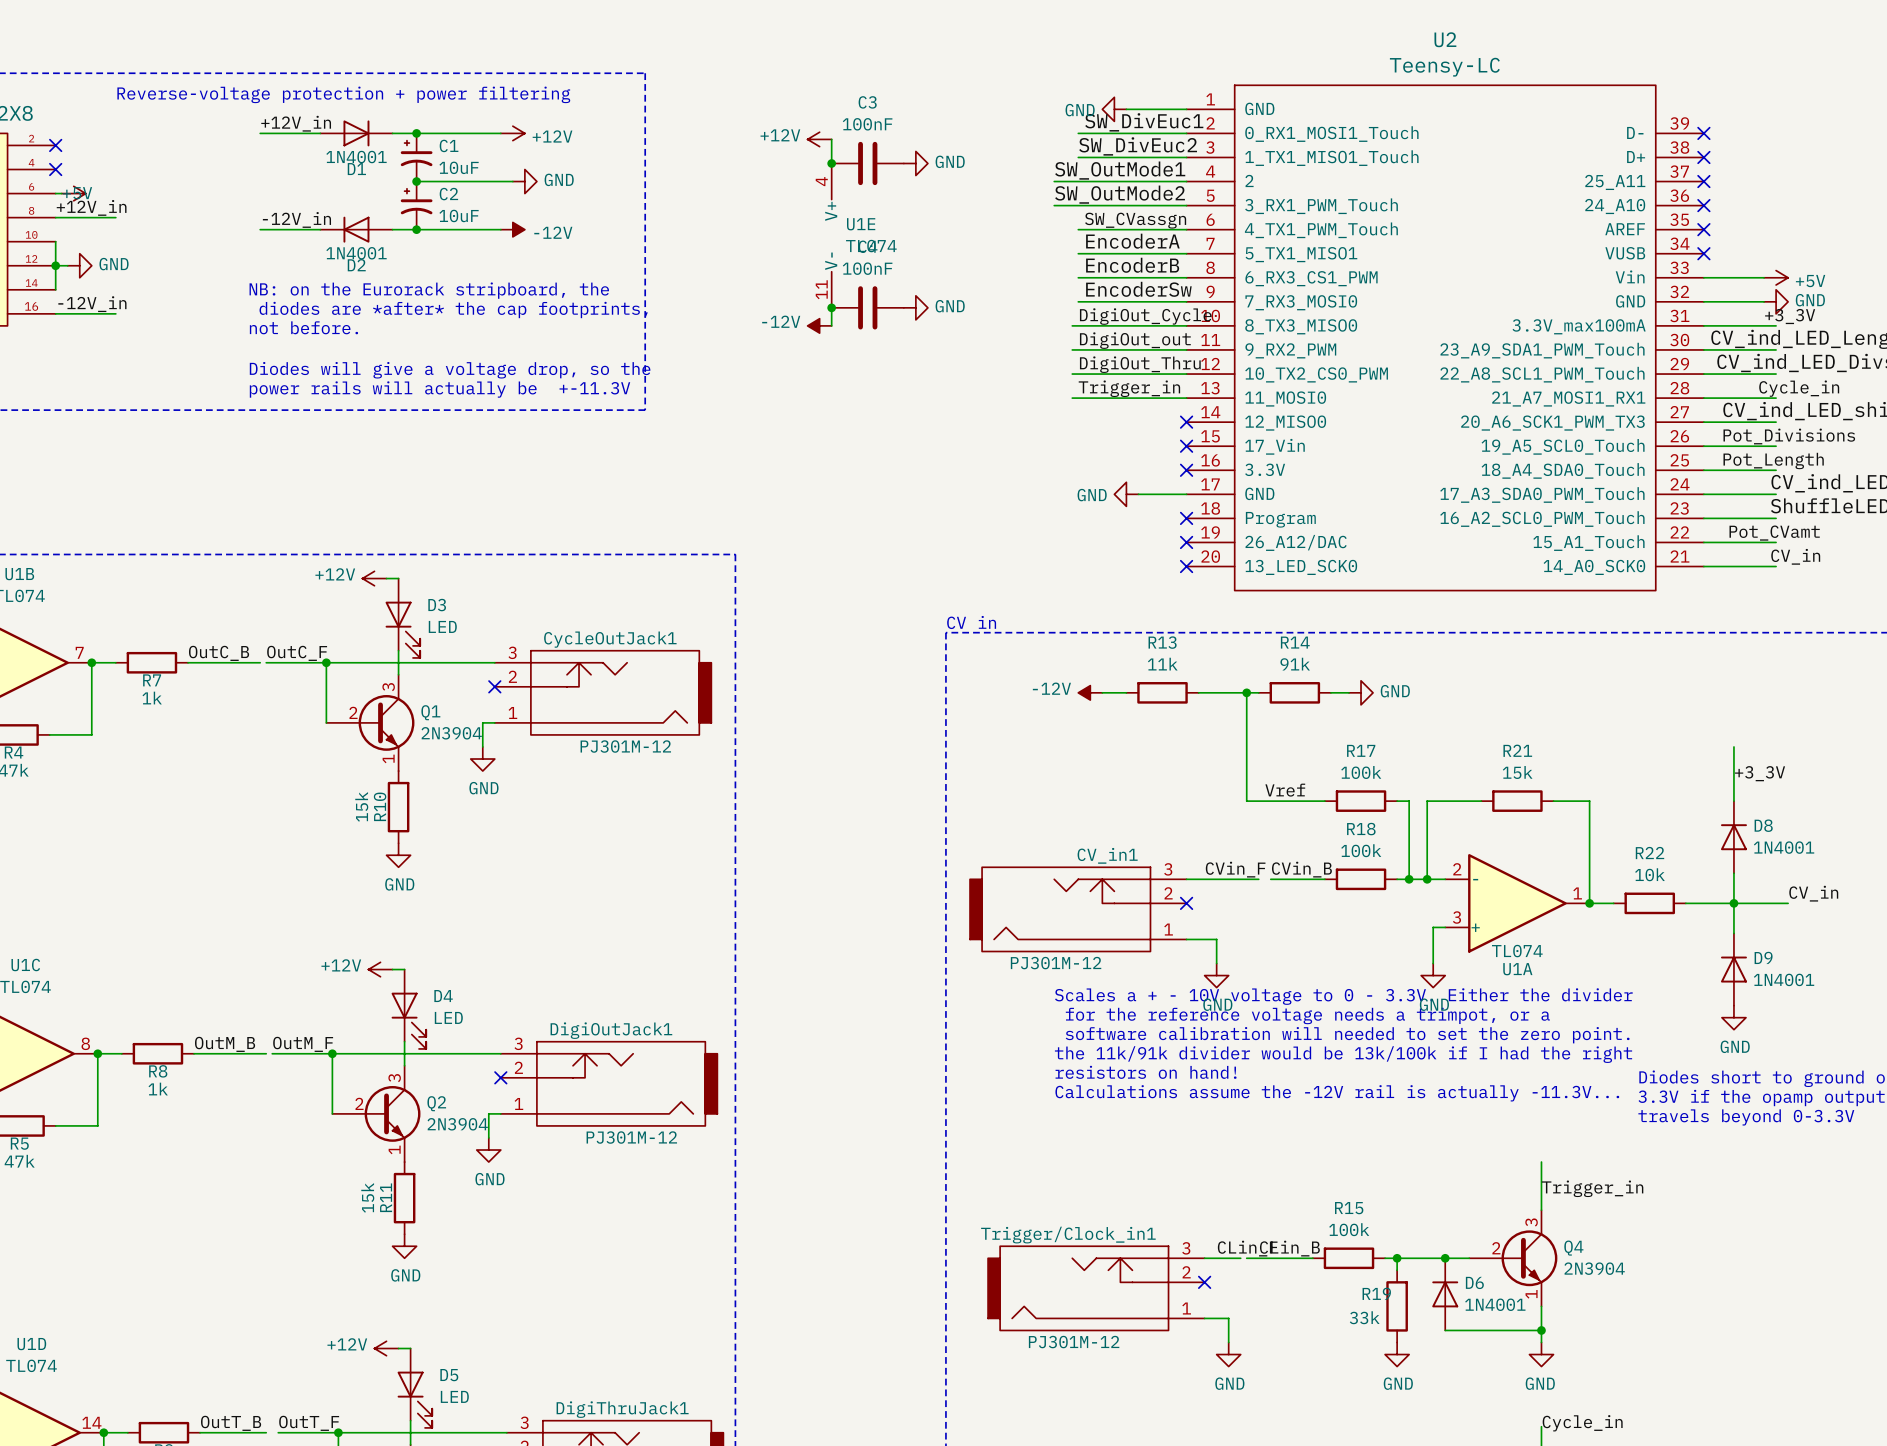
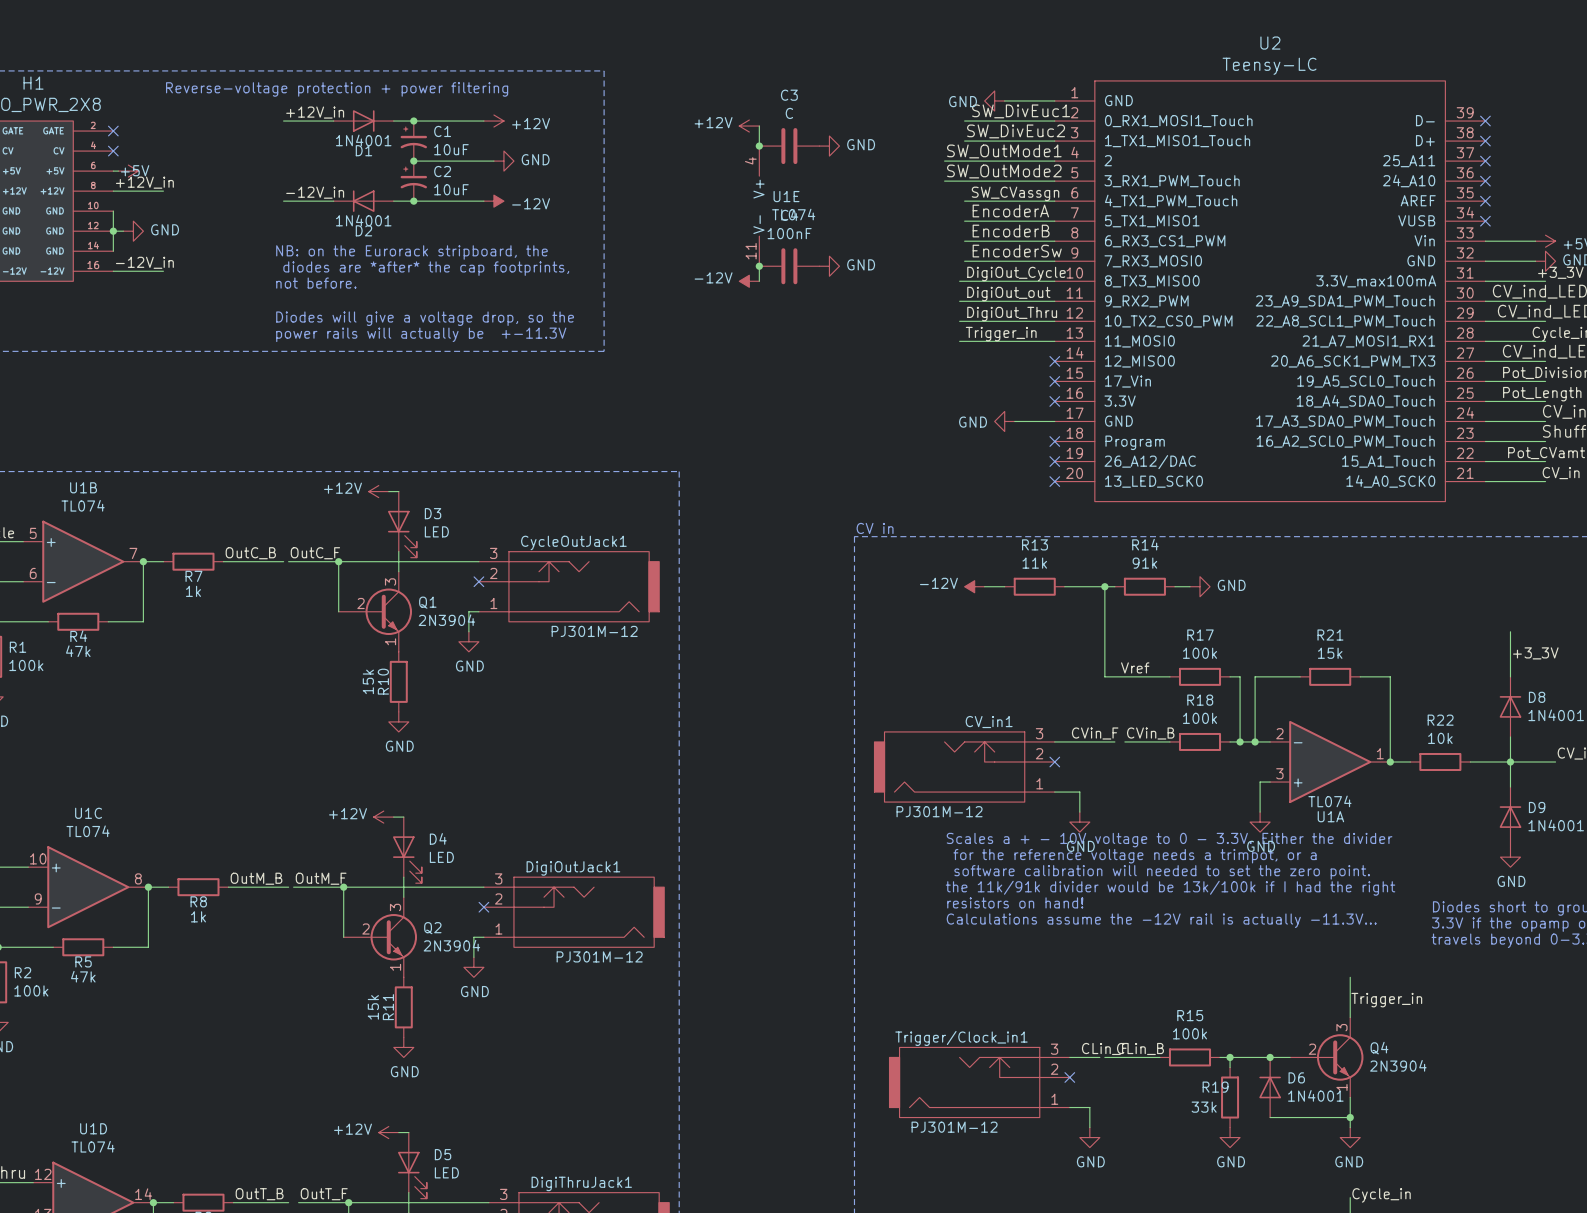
C3 value: 100nF (867, 124) -> C (789, 113)

